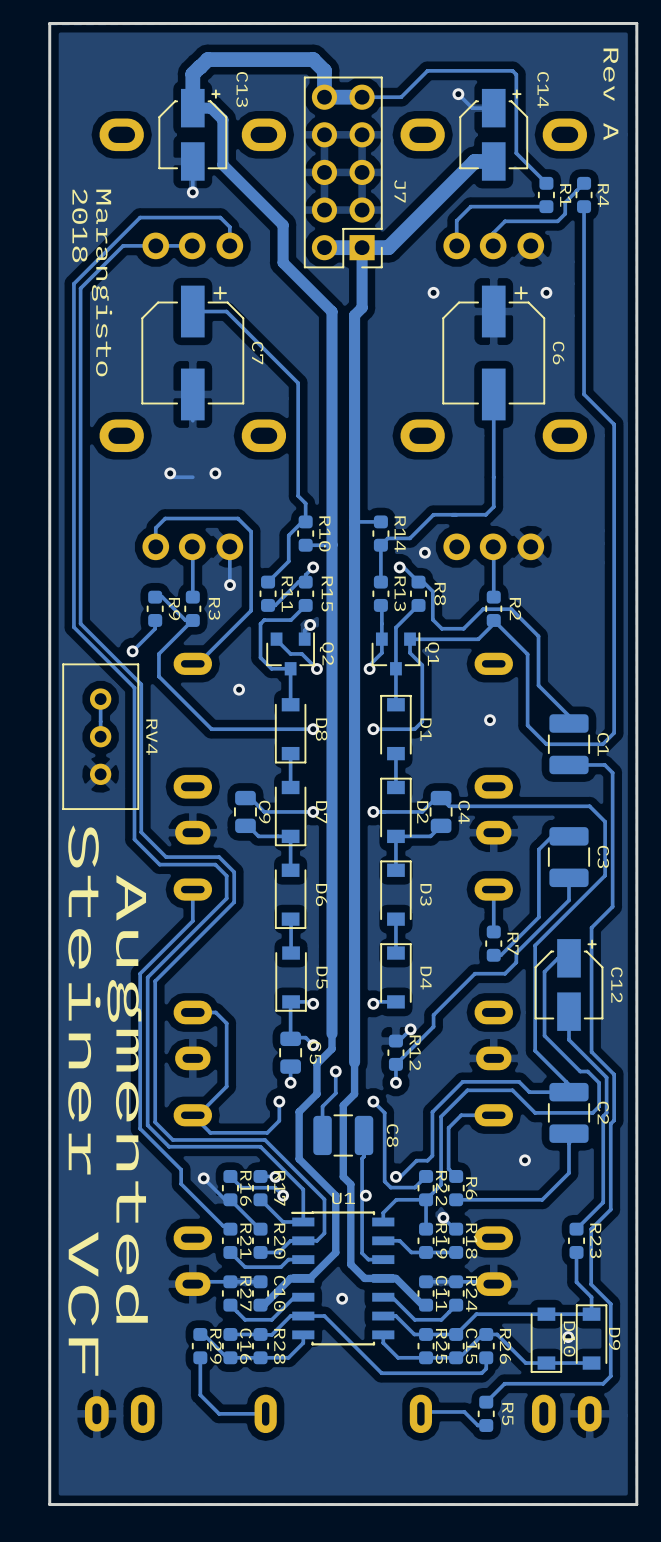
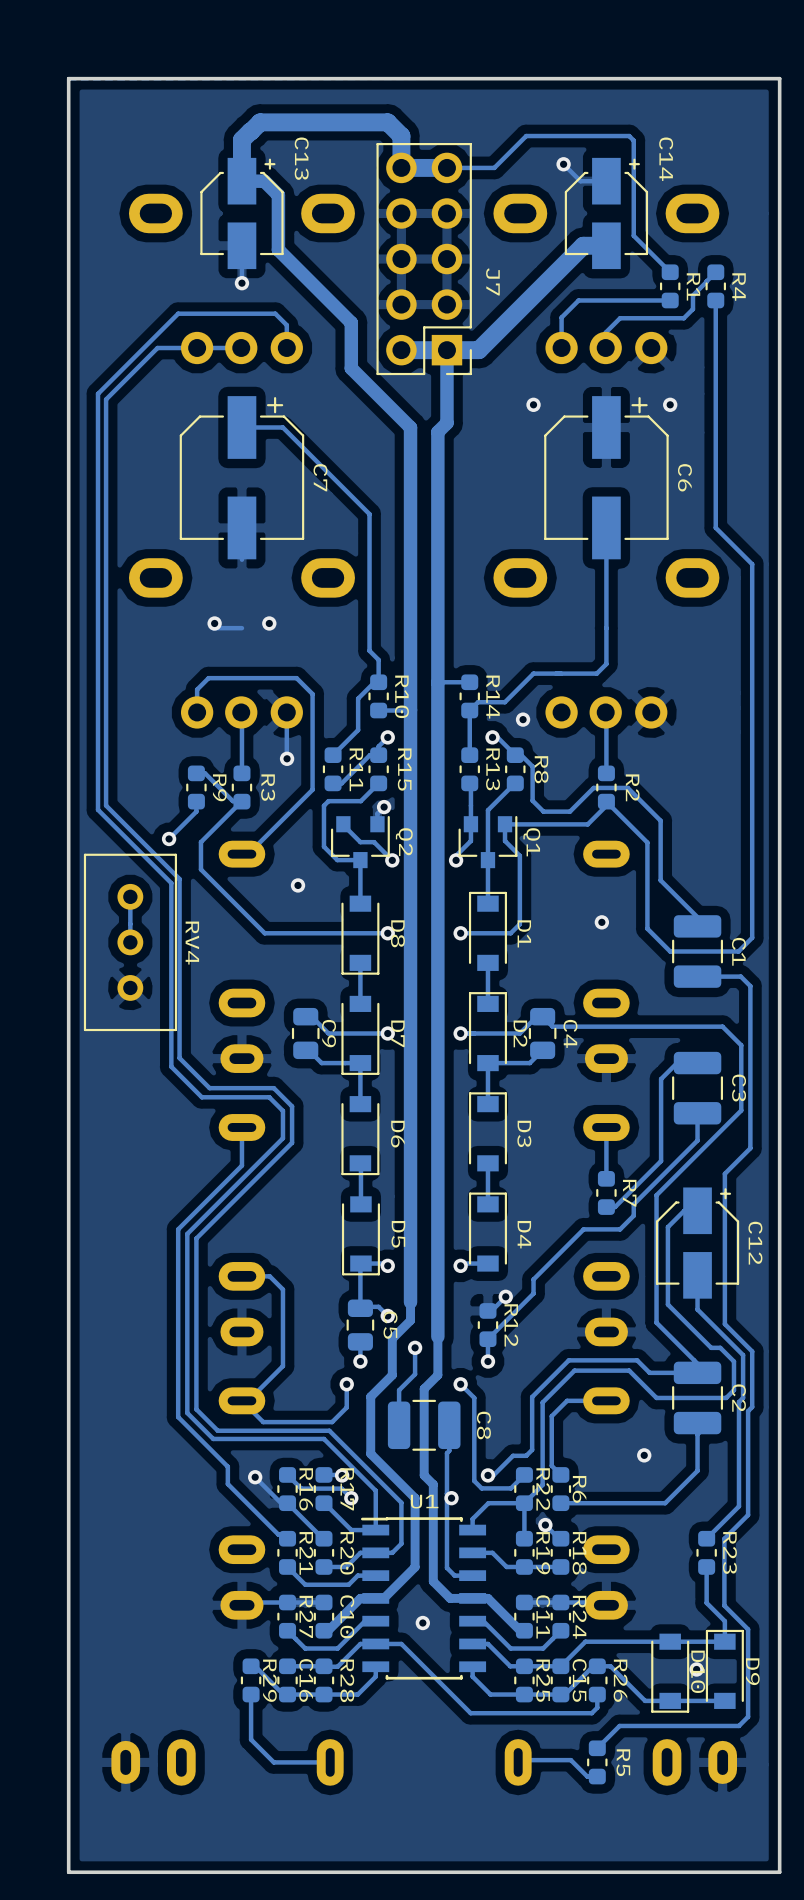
text: Rev A (610, 94) -> none
text: 2018 (79, 225) -> none
text: Marangisto (101, 283) -> none
text: Augmented (127, 1098) -> none
text: Steiner VCF (84, 1100) -> none

